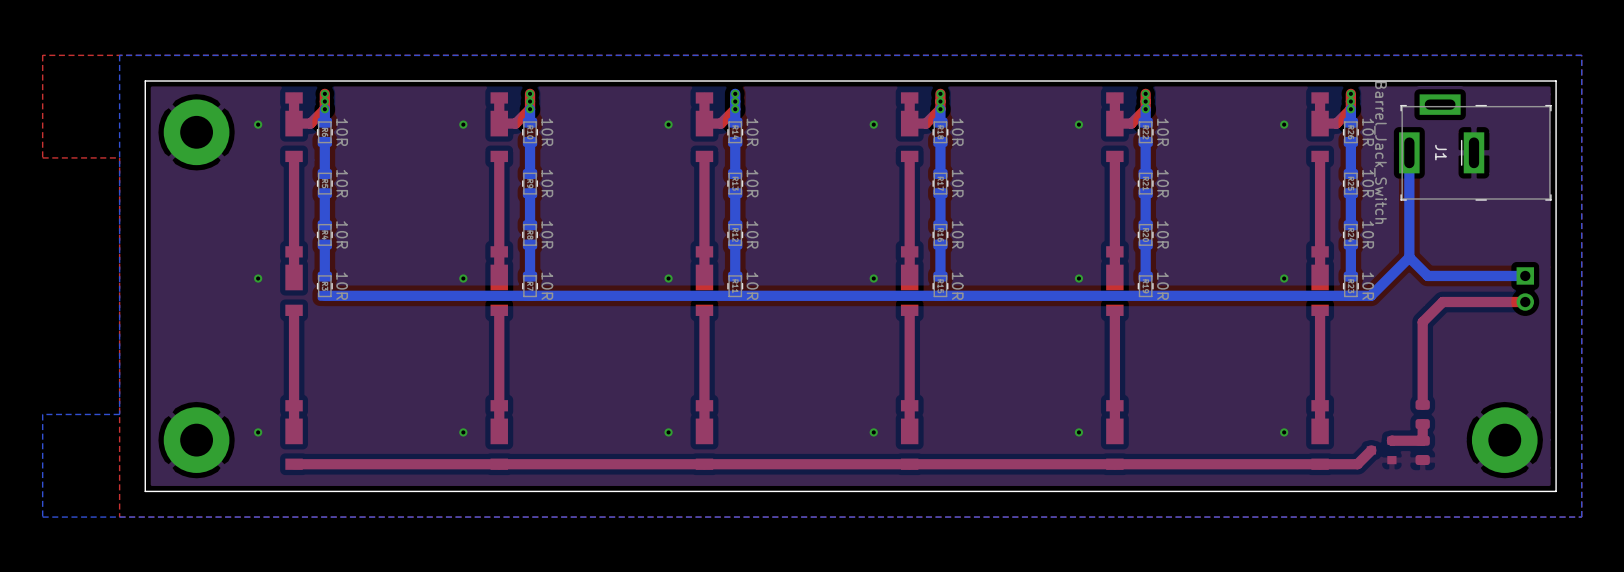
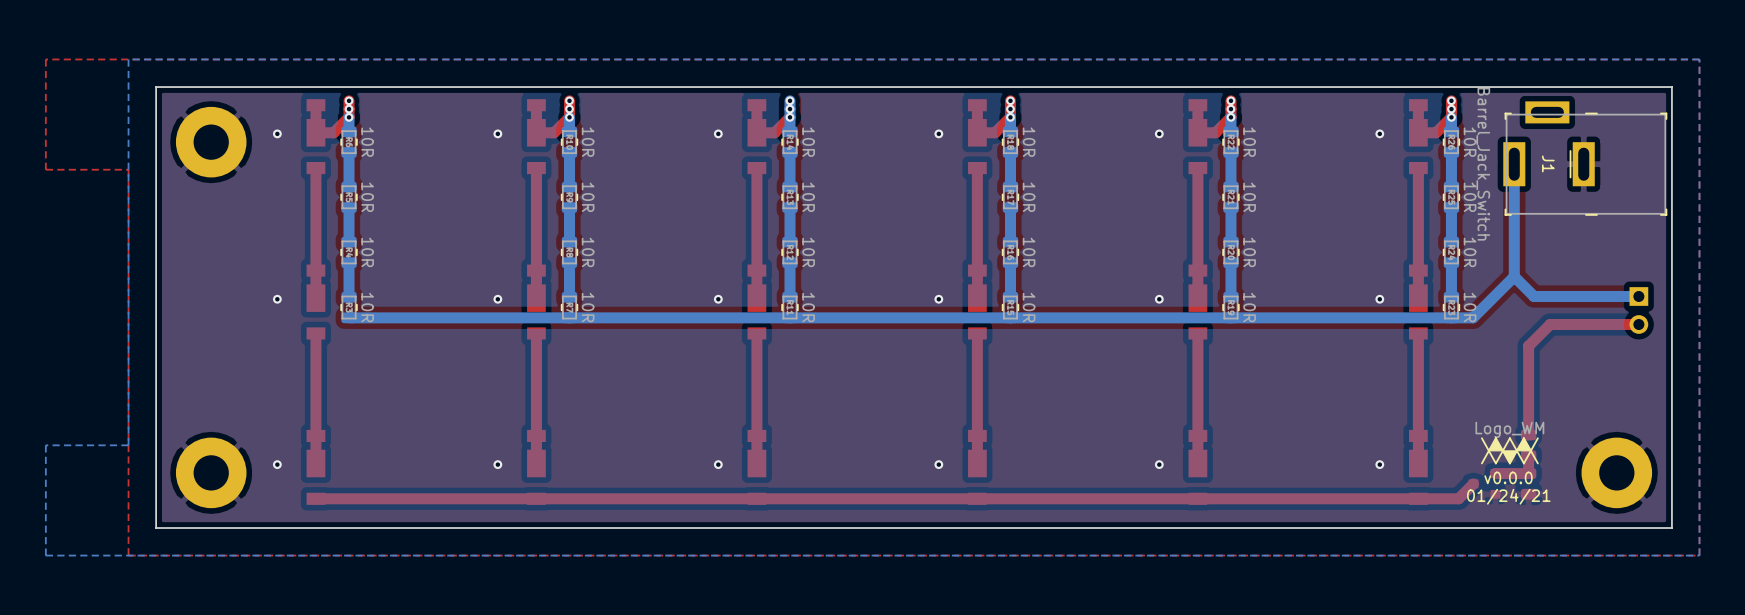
drawing: none -> [1481, 437, 1539, 465]
text: none -> v0.0.0 (1508, 477)
text: none -> 01/24/21 (1508, 496)

